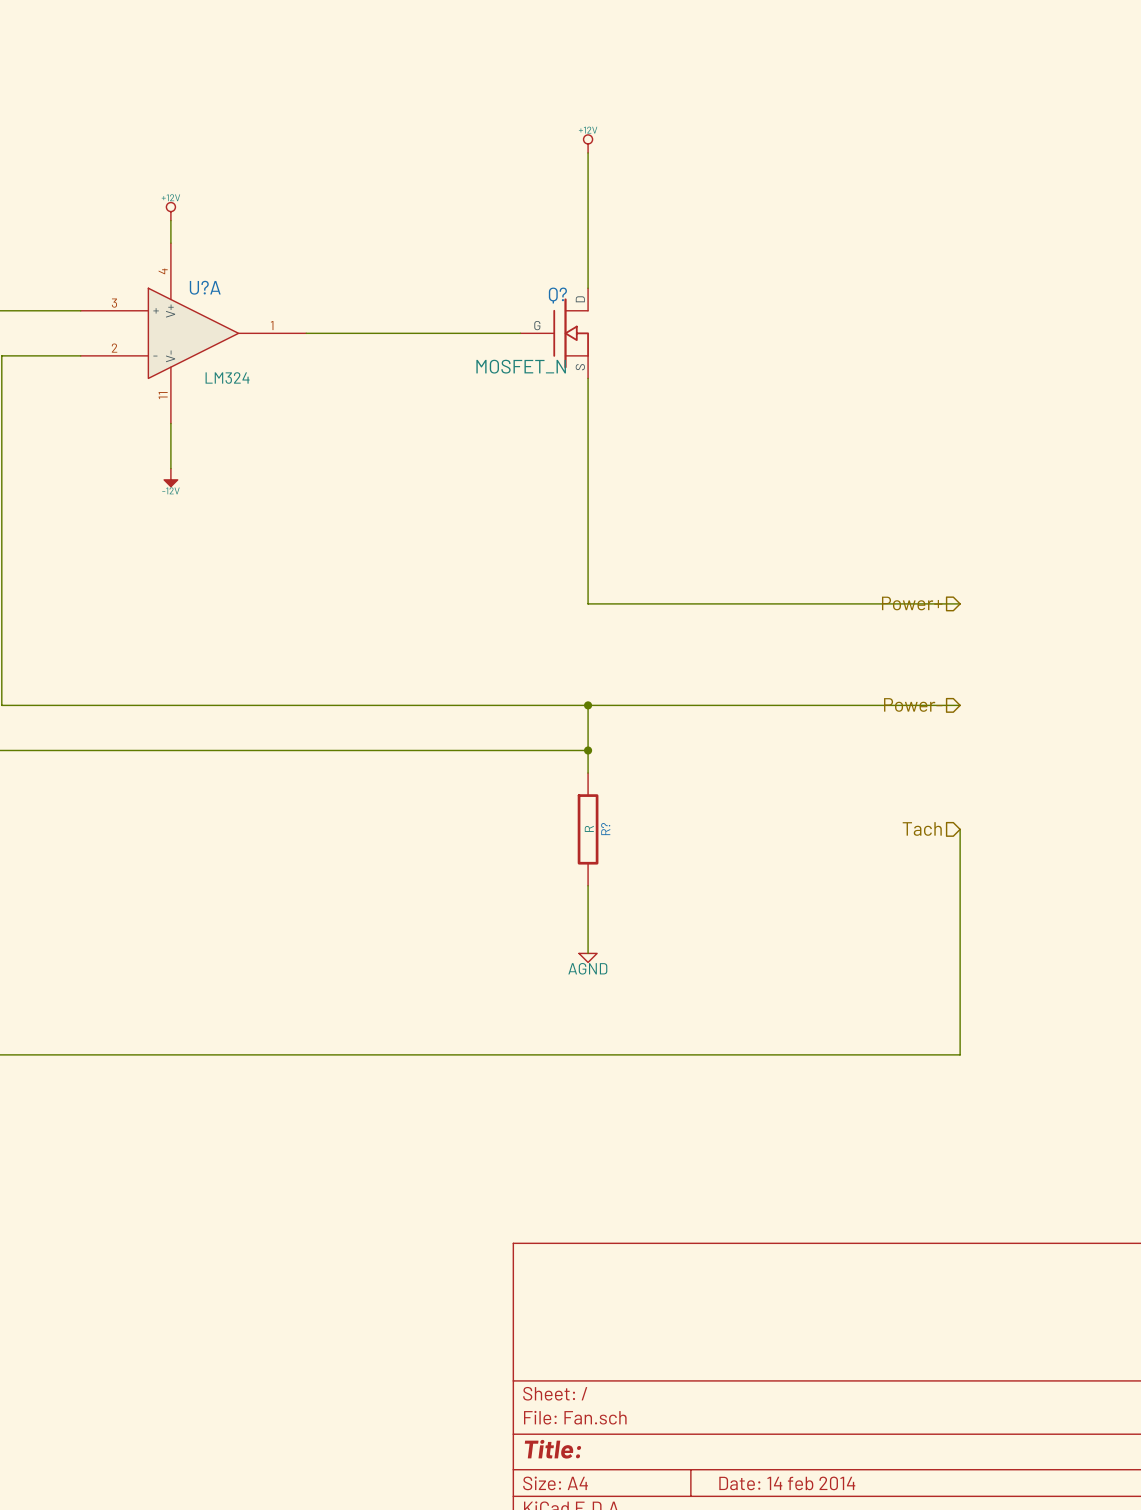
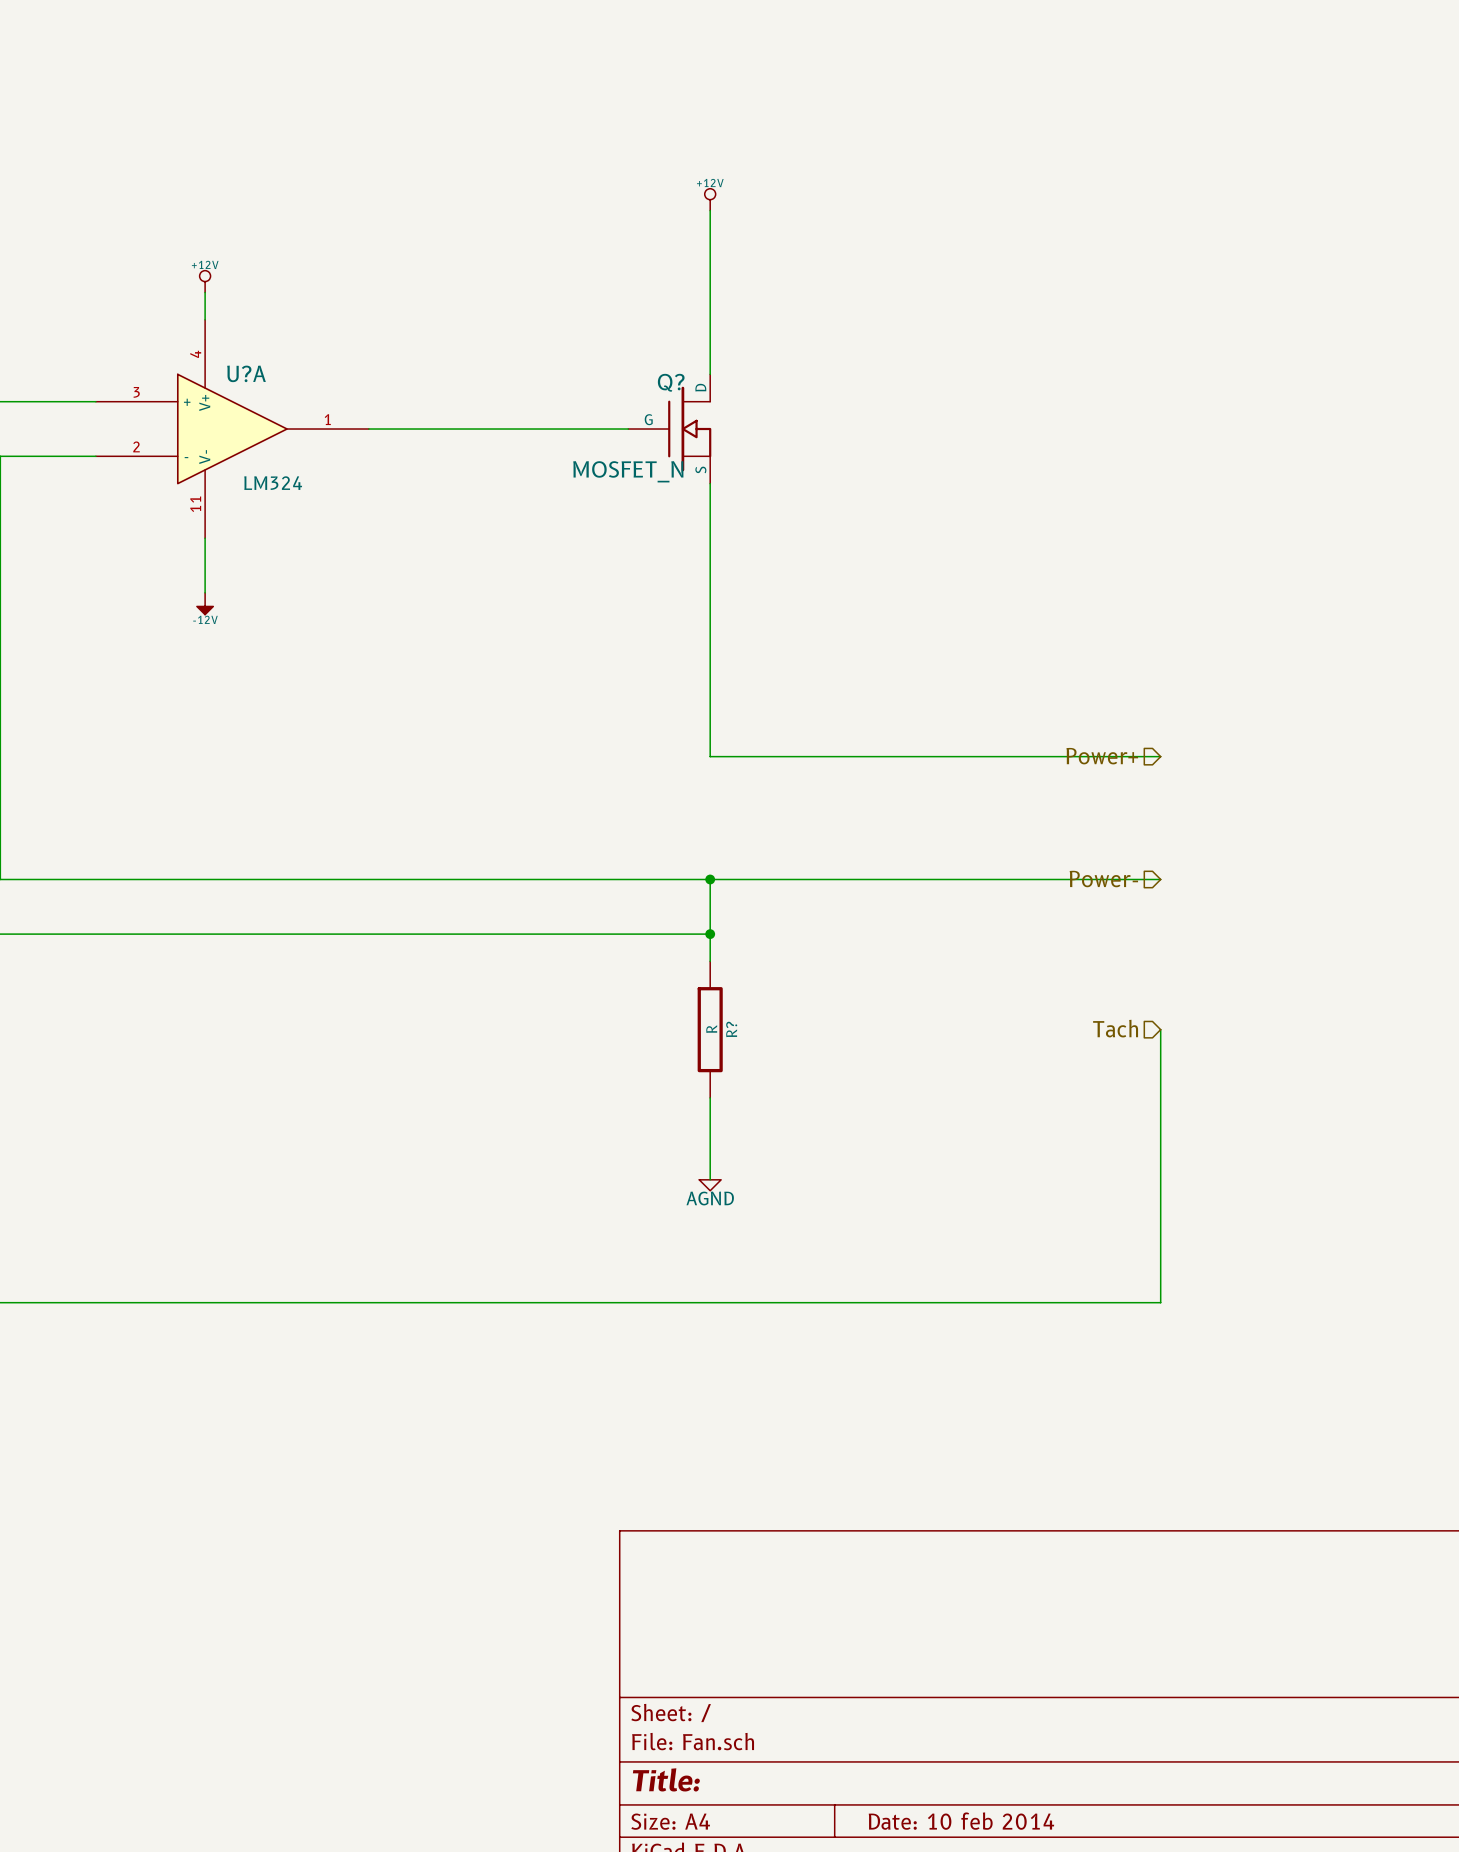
title block: Date: 14 feb 2014 (787, 1483) -> Date: 10 feb 2014 (961, 1821)

